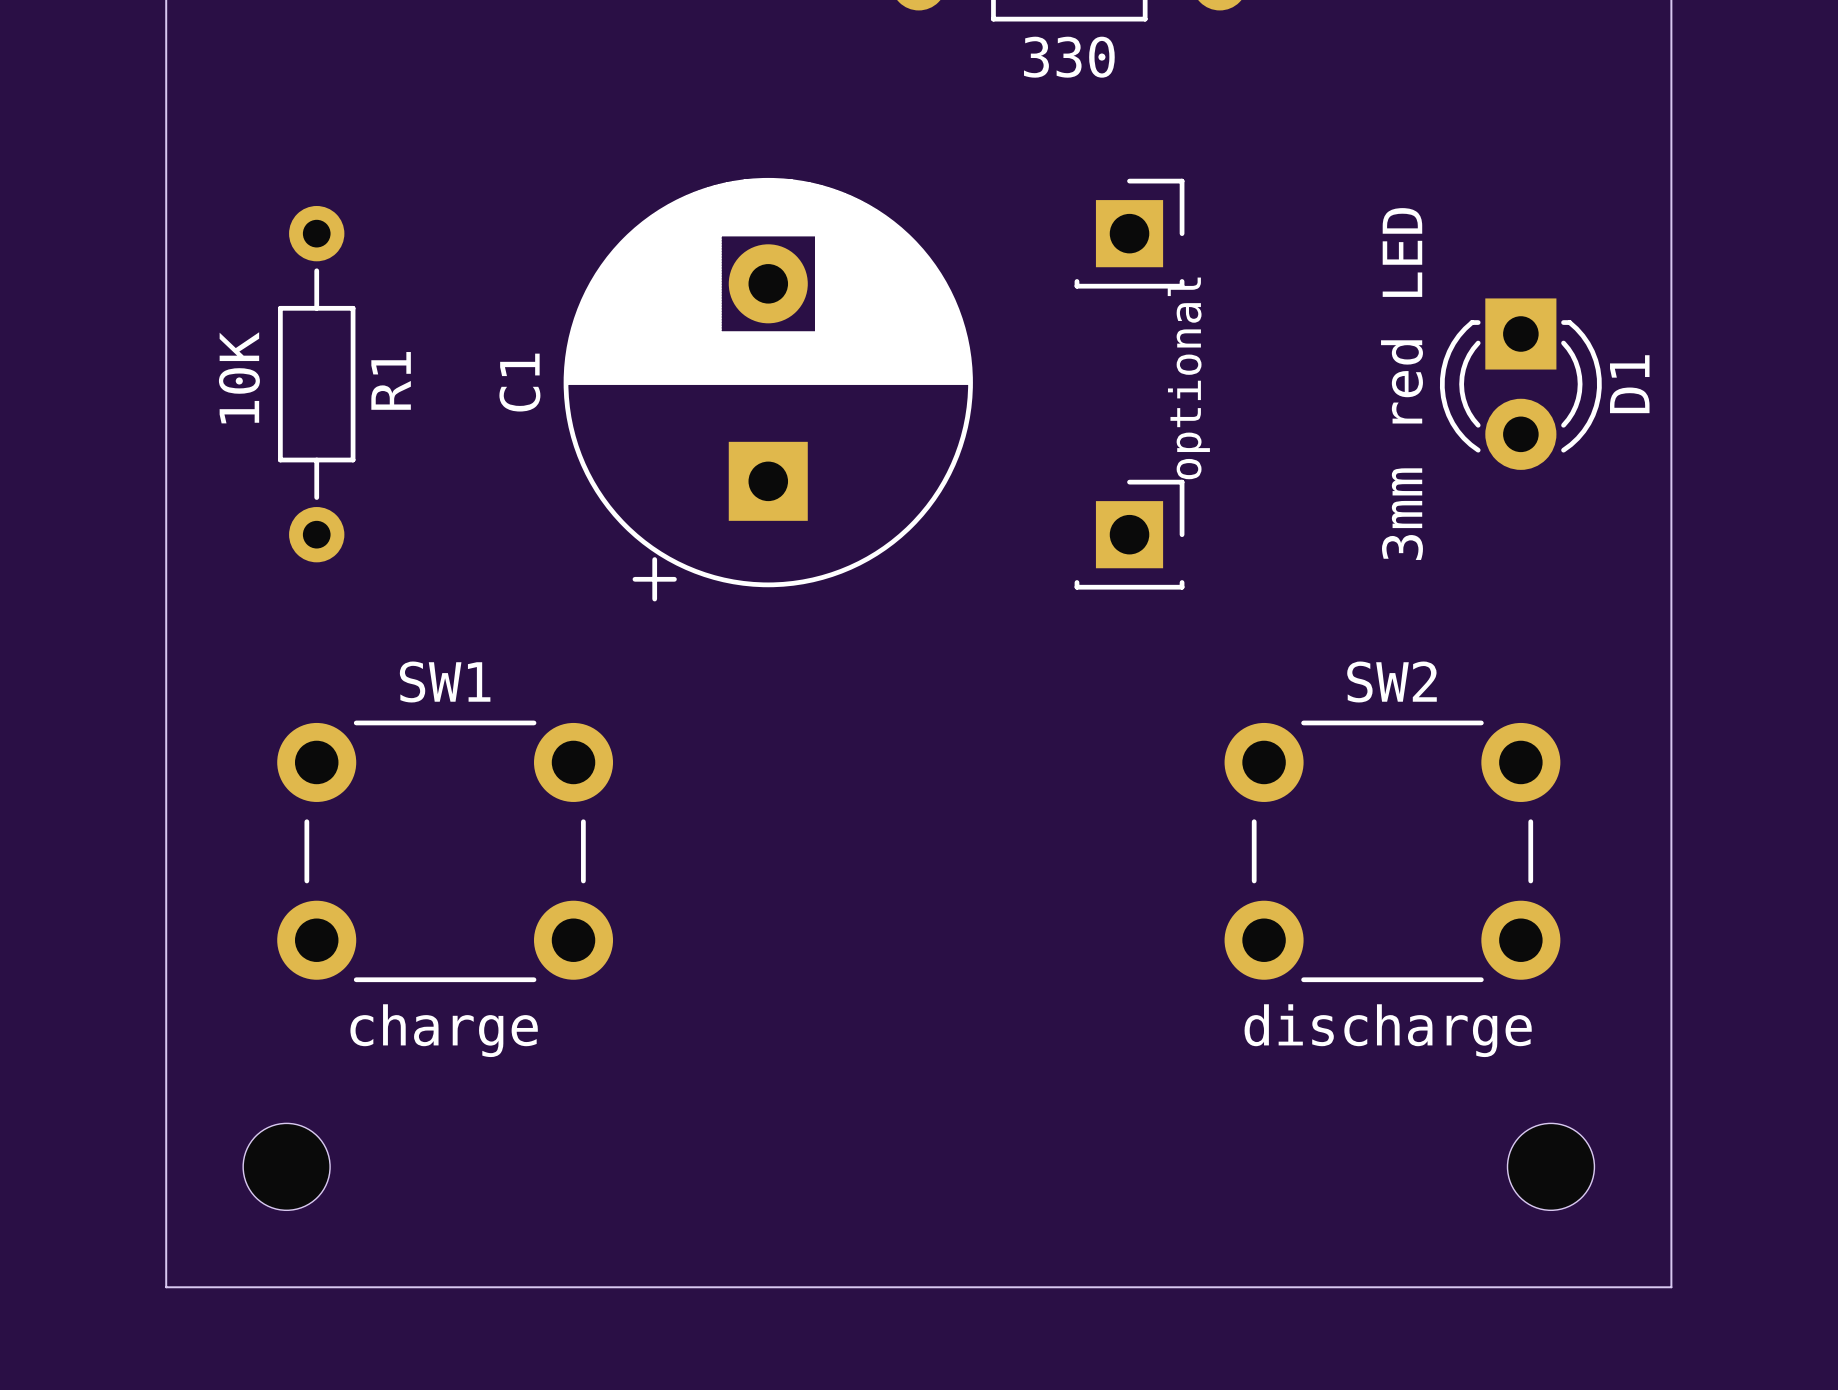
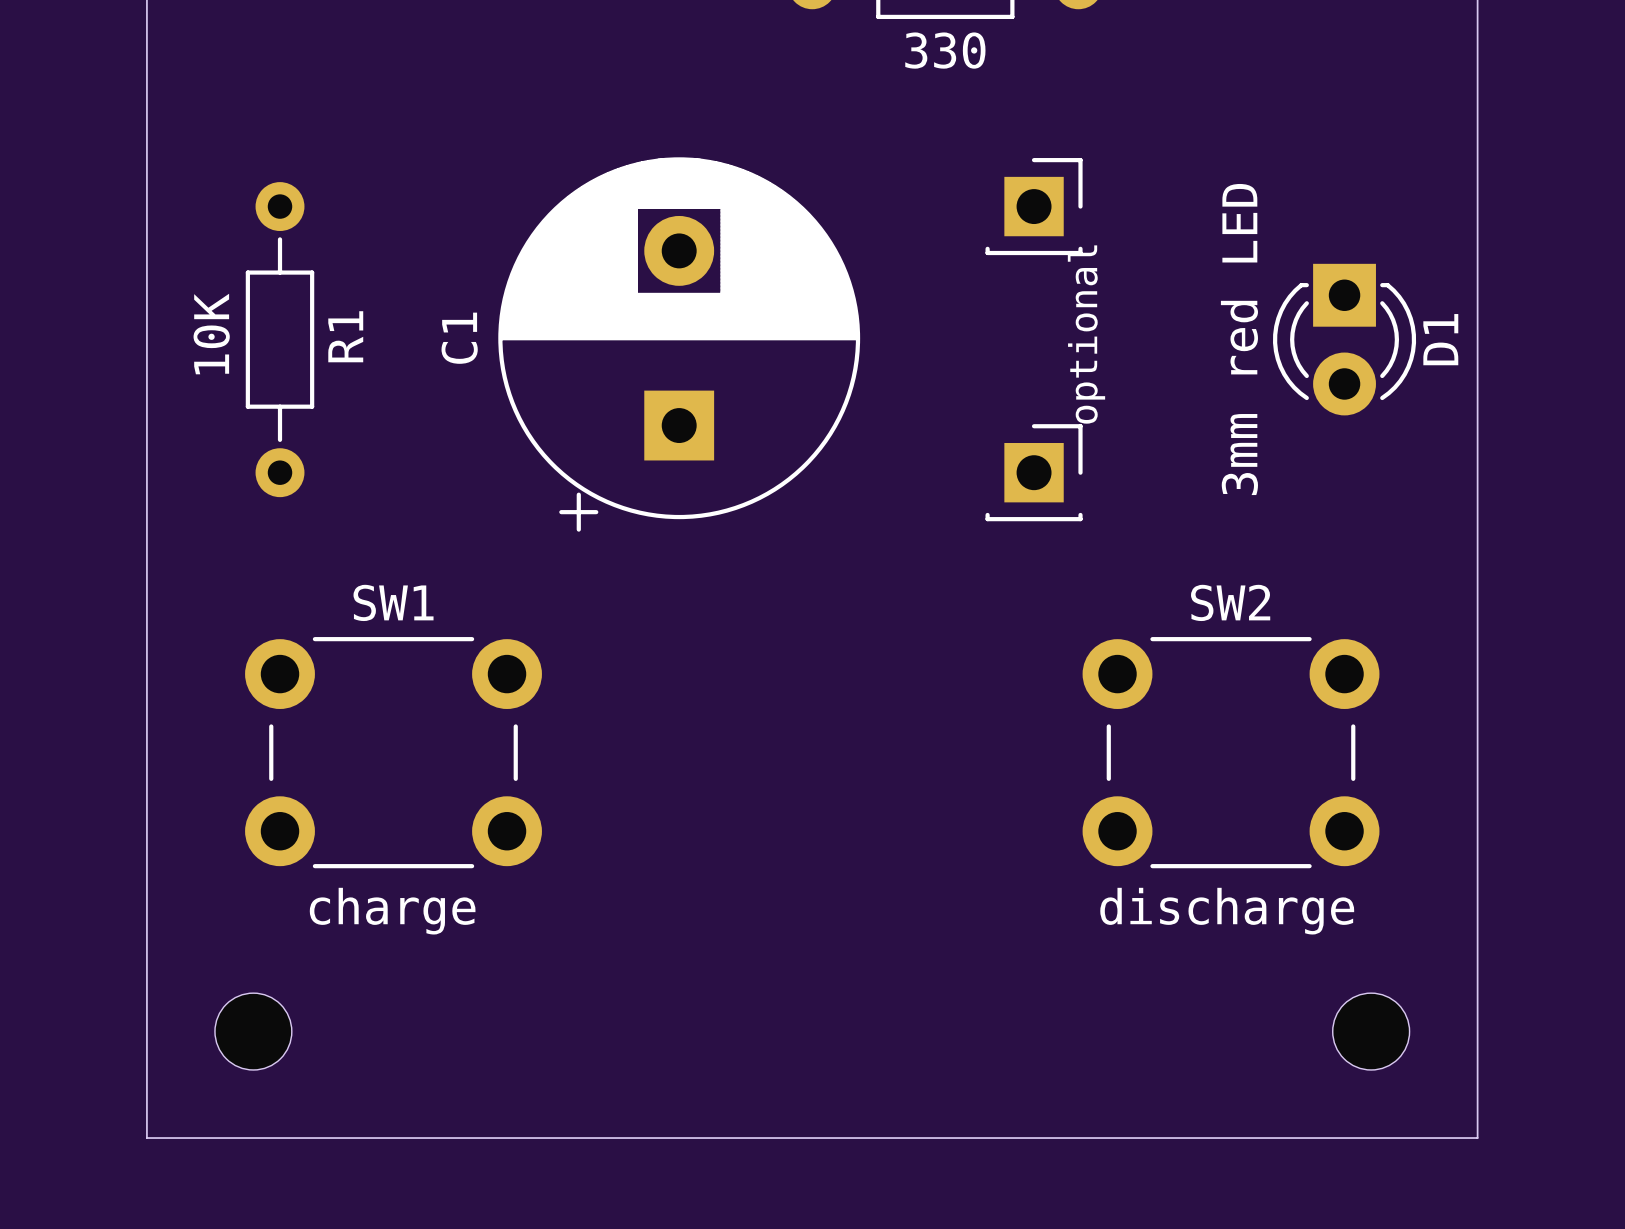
part position: (1129, 233) -> (1034, 206)
text position: optional (1188, 378) -> optional (1086, 334)
part position: (1129, 534) -> (1034, 472)

